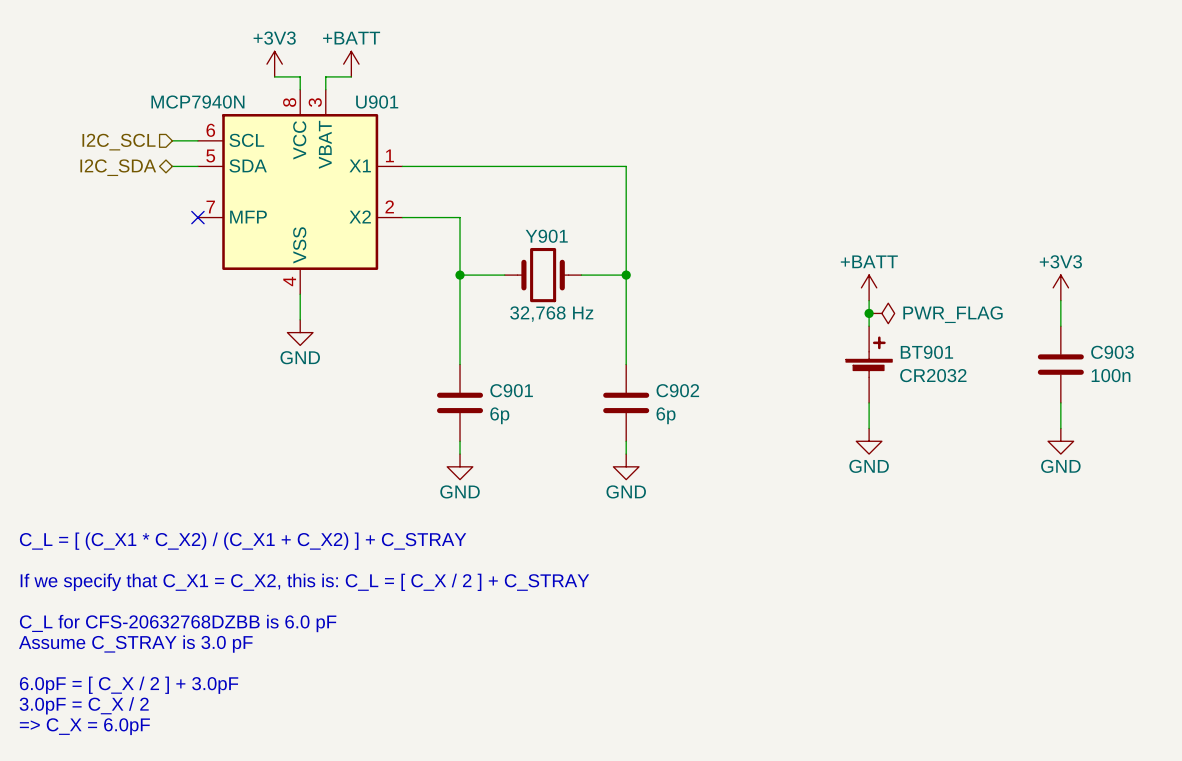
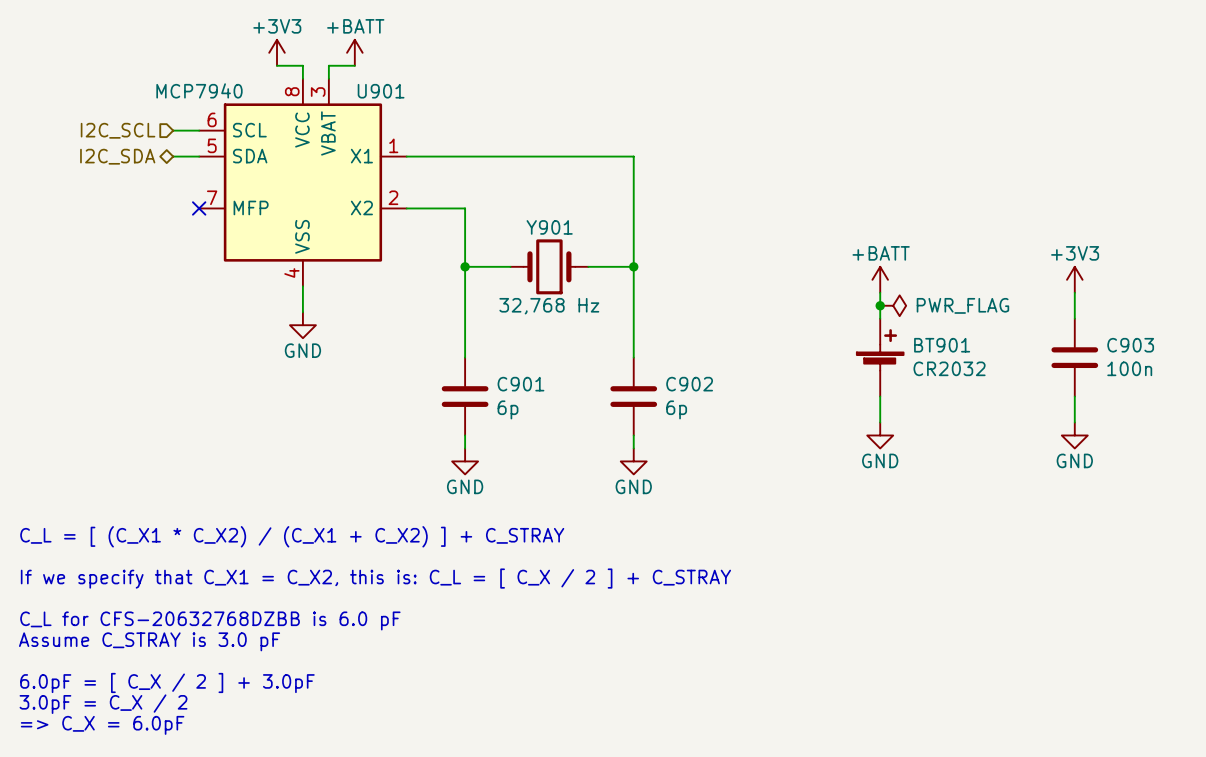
U901 value: MCP7940N (197, 102) -> MCP7940 (199, 90)

